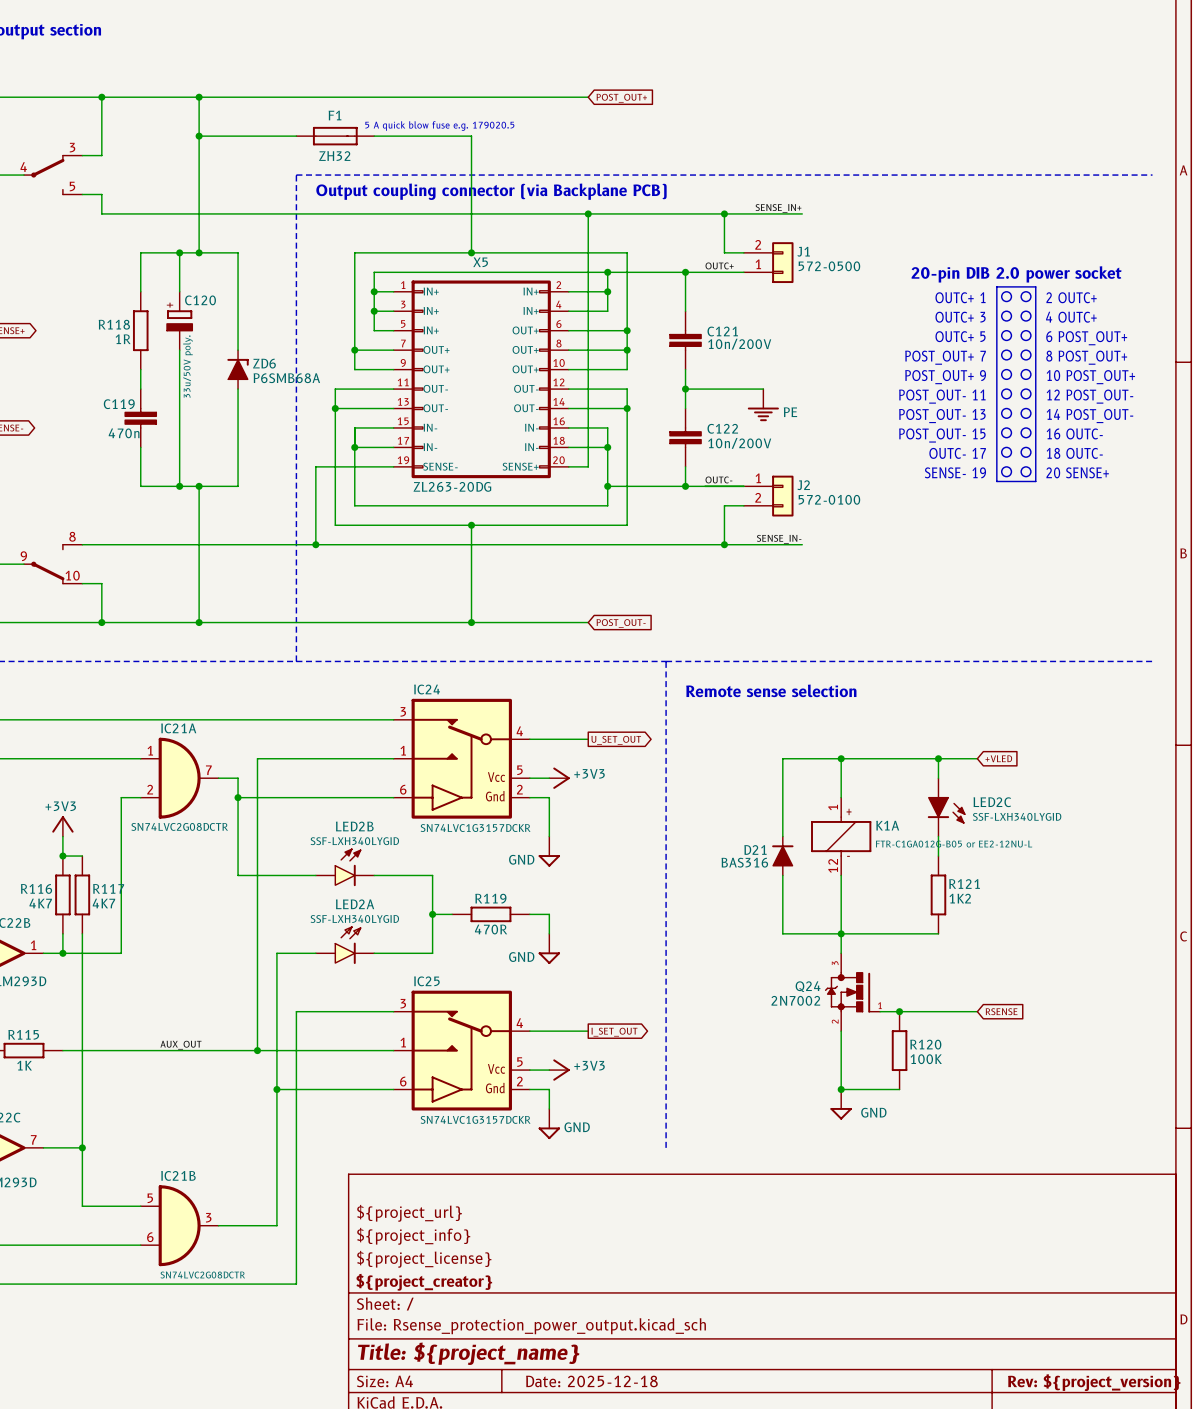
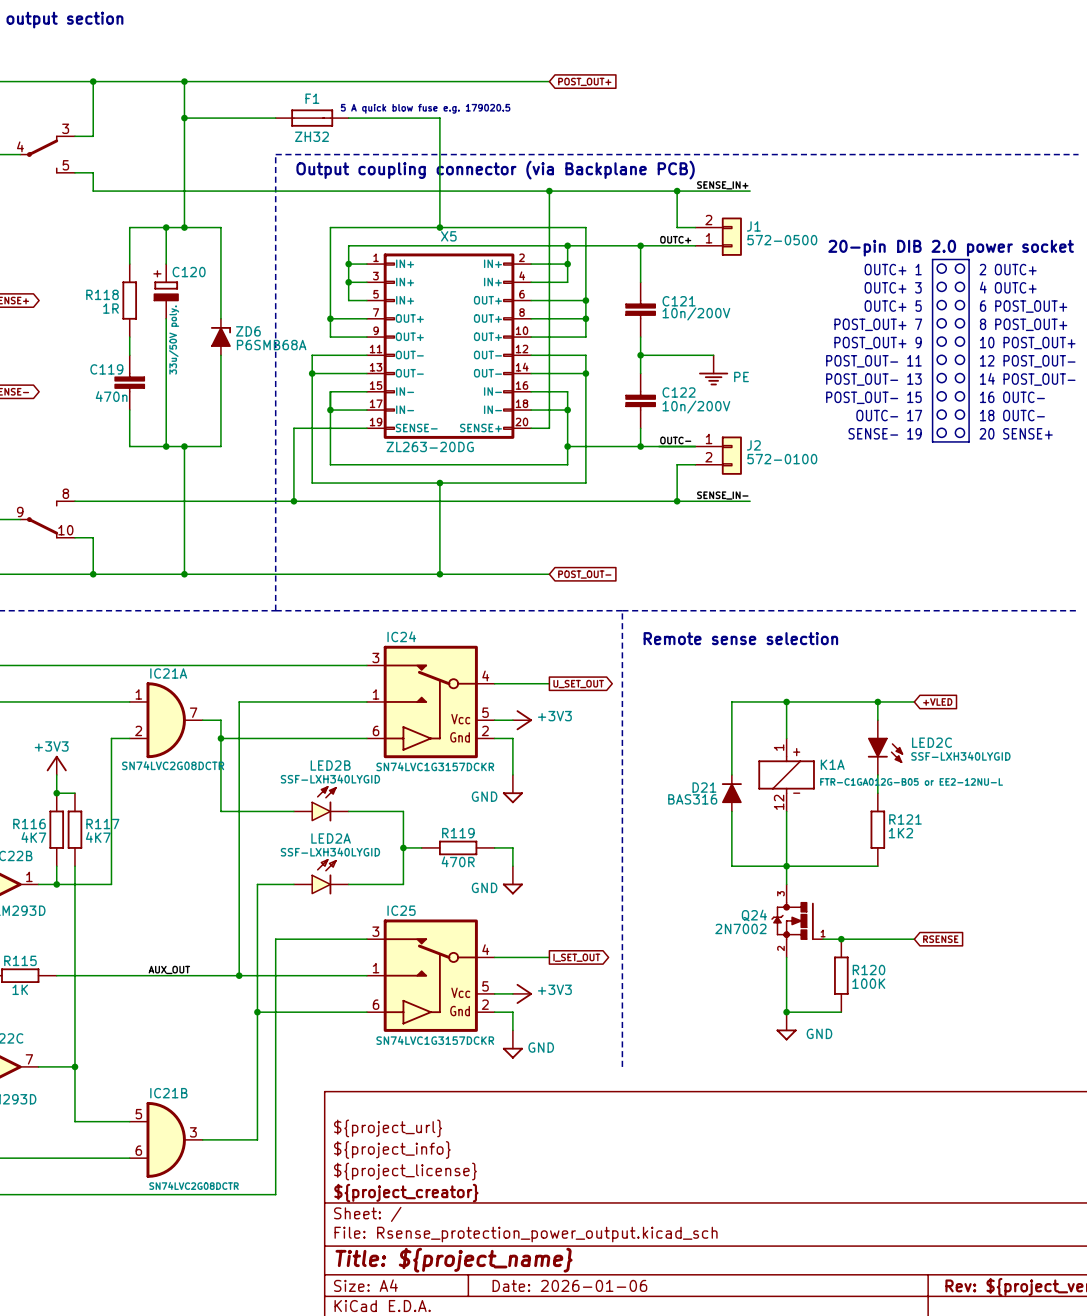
title block: Date: 2025-12-18 (591, 1381) -> Date: 2026-01-06 (569, 1285)

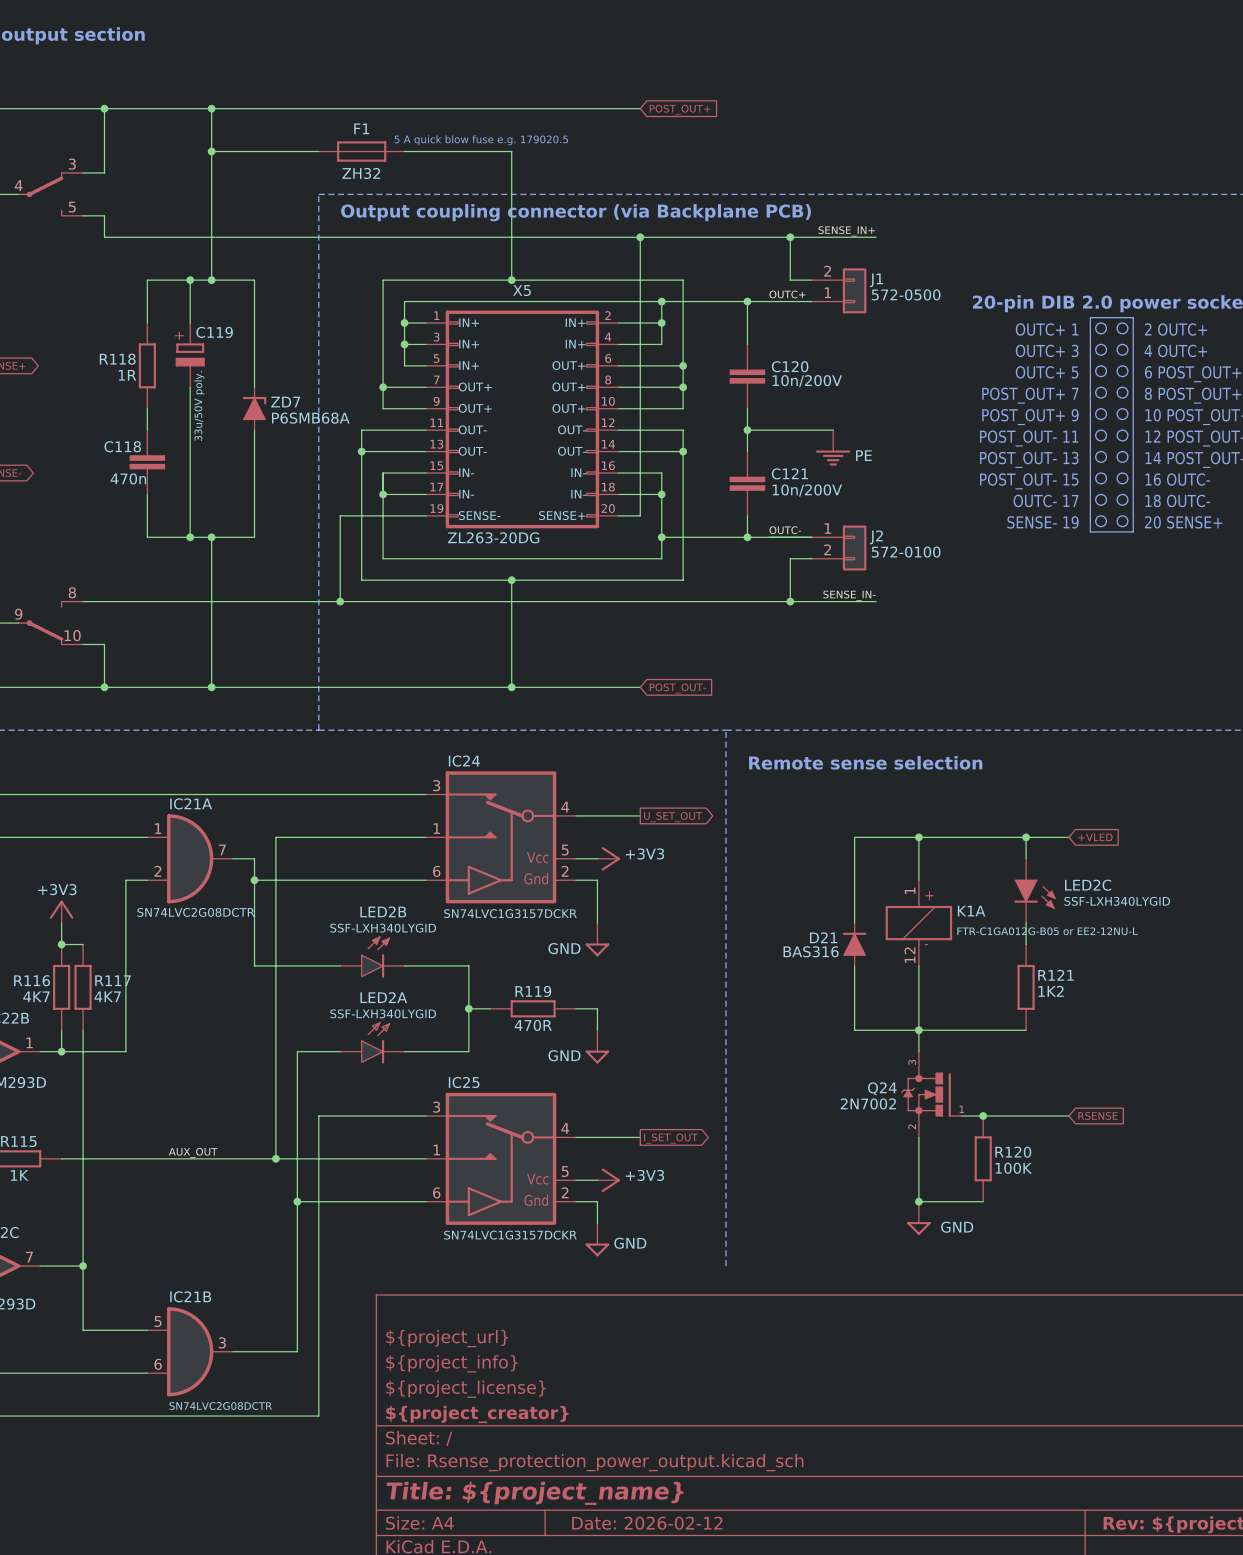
C120 name: C120 (189, 272) -> C119 (214, 332)
C121 name: C121 (679, 301) -> C120 (790, 366)
ZD6 name: ZD6 (248, 331) -> ZD7 (285, 402)
C119 name: C119 (106, 369) -> C118 (122, 446)
C122 name: C122 (679, 392) -> C121 (789, 473)
title block: Date: 2026-01-06 (569, 1285) -> Date: 2026-02-12 (647, 1523)

